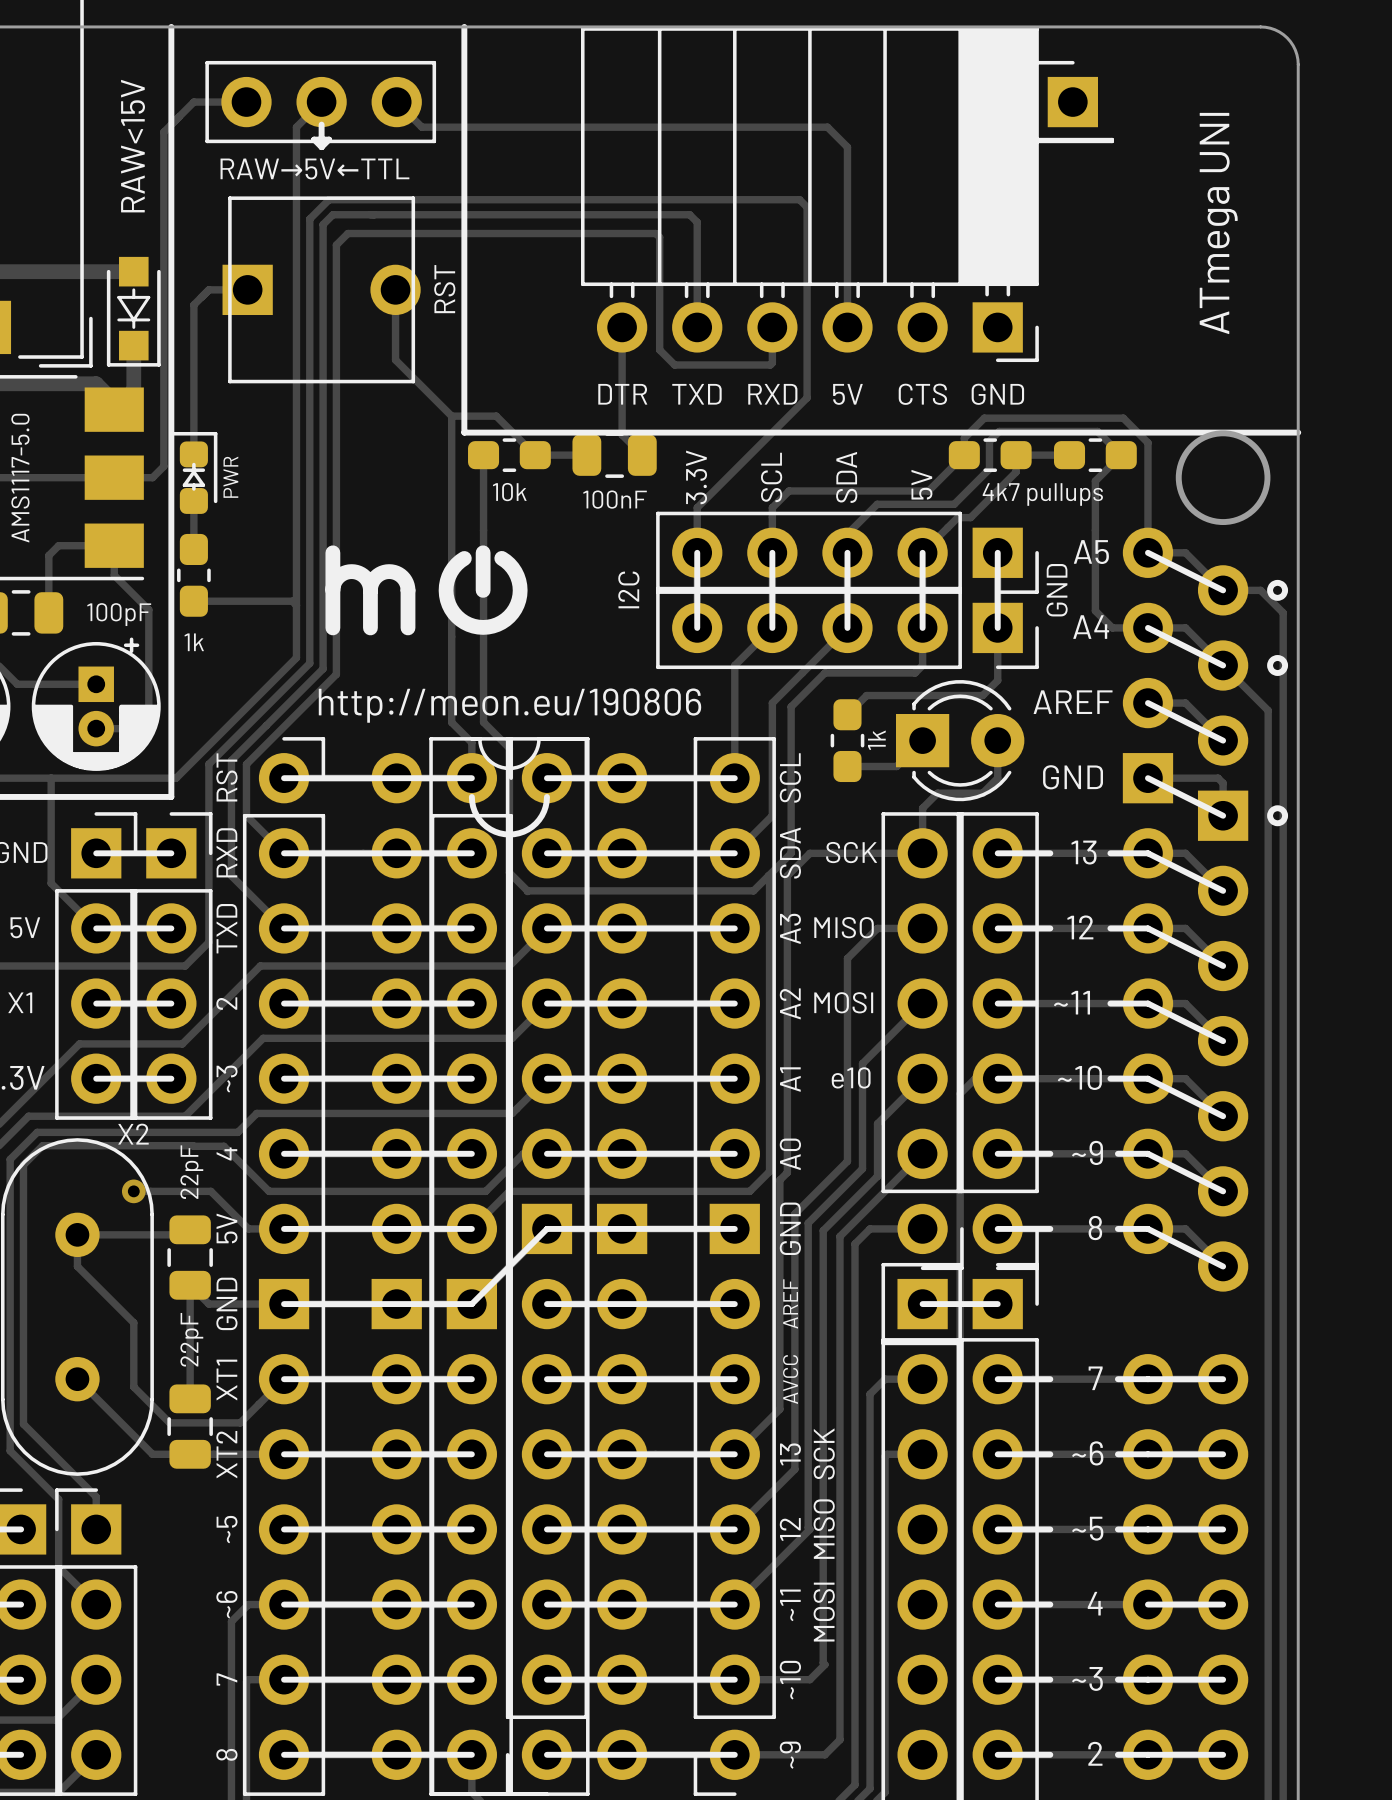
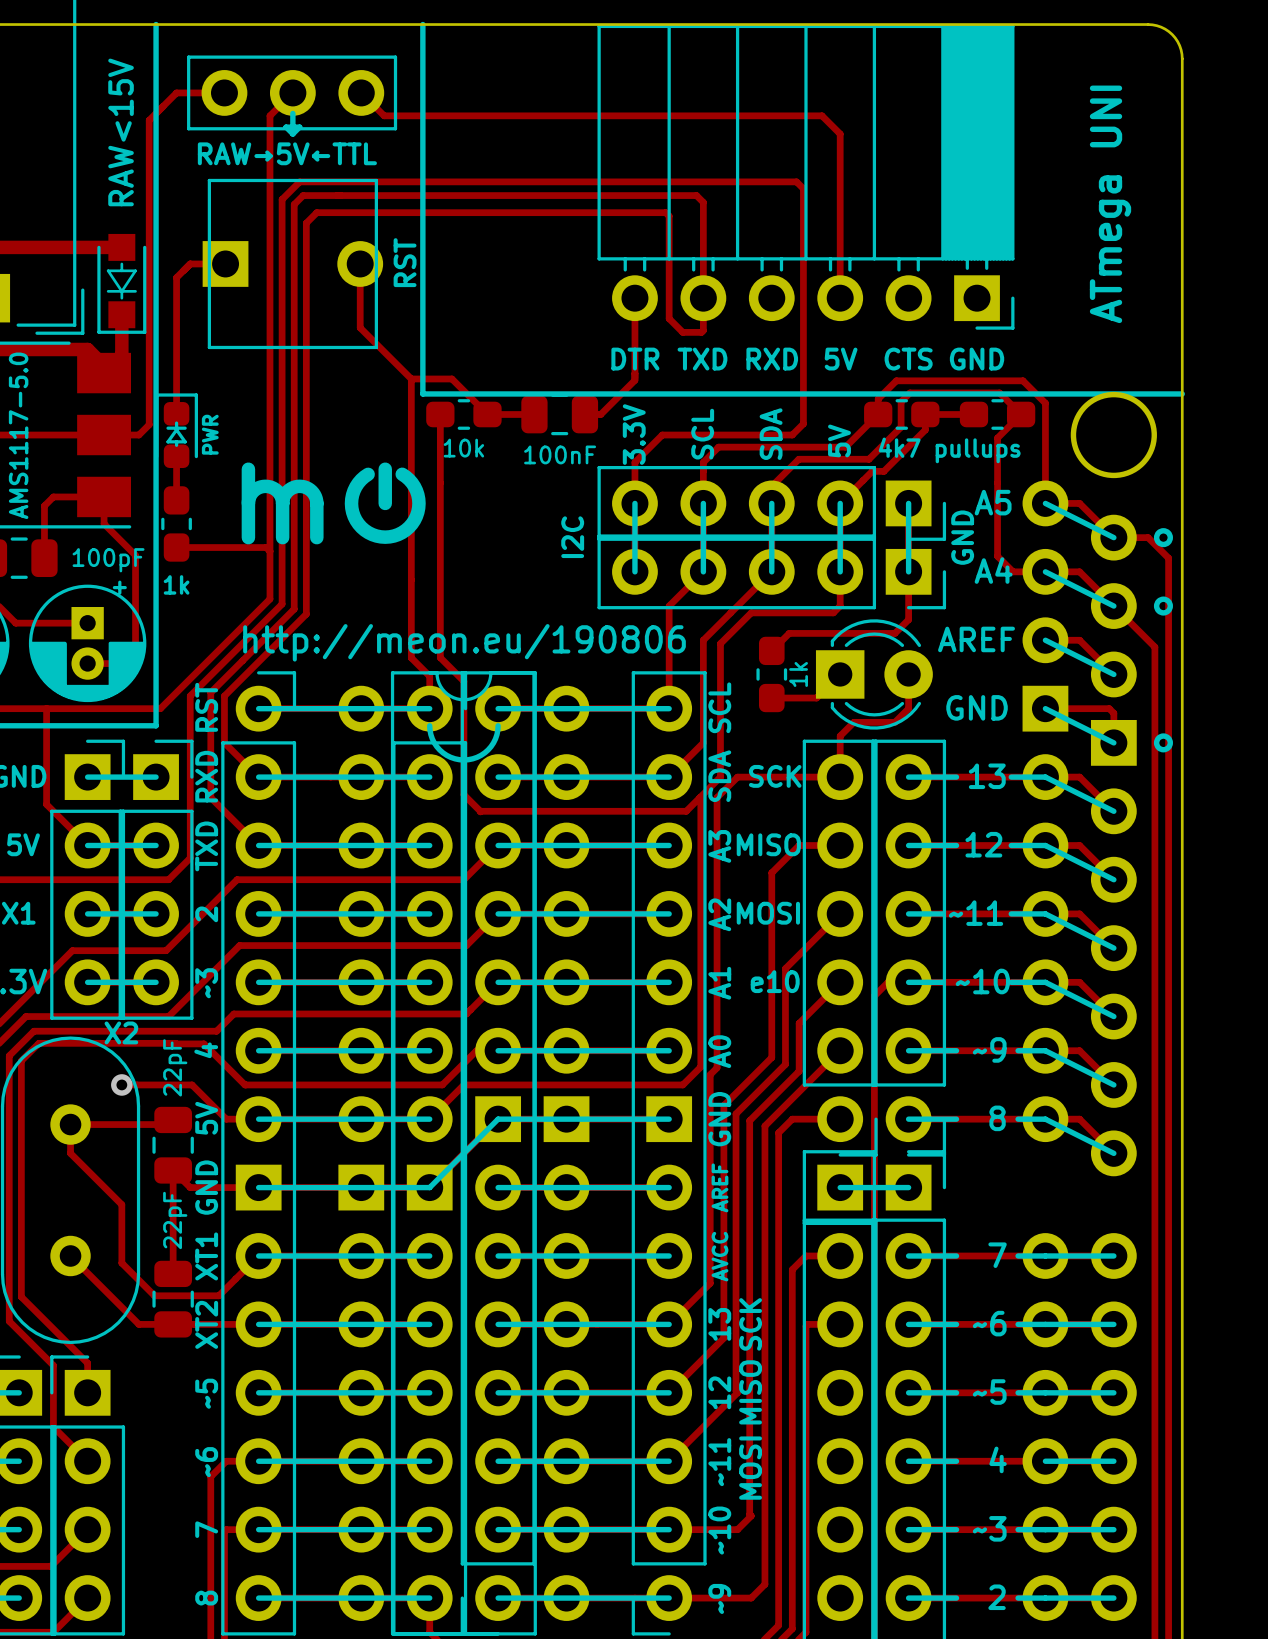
part: (1072, 102) -> none
track: (827, 127) (847, 147) (847, 327) -> (753, 115) (822, 115) (840, 133) (840, 298)
part position: (809, 194) -> (805, 177)
track: (799, 199) (807, 207) (807, 397) (727, 477) -> (728, 181) (796, 181) (803, 188) (803, 423) (792, 435) (662, 435)
track: (689, 214) (697, 222) (697, 327) -> (628, 195) (696, 195) (703, 202) (703, 298)
track: (655, 233) (659, 237) (659, 349) (674, 364) (749, 364) -> (597, 212) (665, 212) (669, 216) (669, 318) (682, 332)
track: (622, 327) (622, 434) (642, 455) -> (634, 298) (634, 380) (600, 414) (584, 414)
text: DTR (622, 394) -> none
text: TXD (696, 394) -> DTR (635, 359)
text: RXD (772, 394) -> TXD (702, 359)
text: 5V (847, 394) -> RXD (772, 359)
text: CTS (922, 394) -> 5V (841, 359)
text: GND (997, 394) -> CTS (908, 359)
text: none -> GND (977, 359)
drawing position: (426, 590) -> (333, 503)

